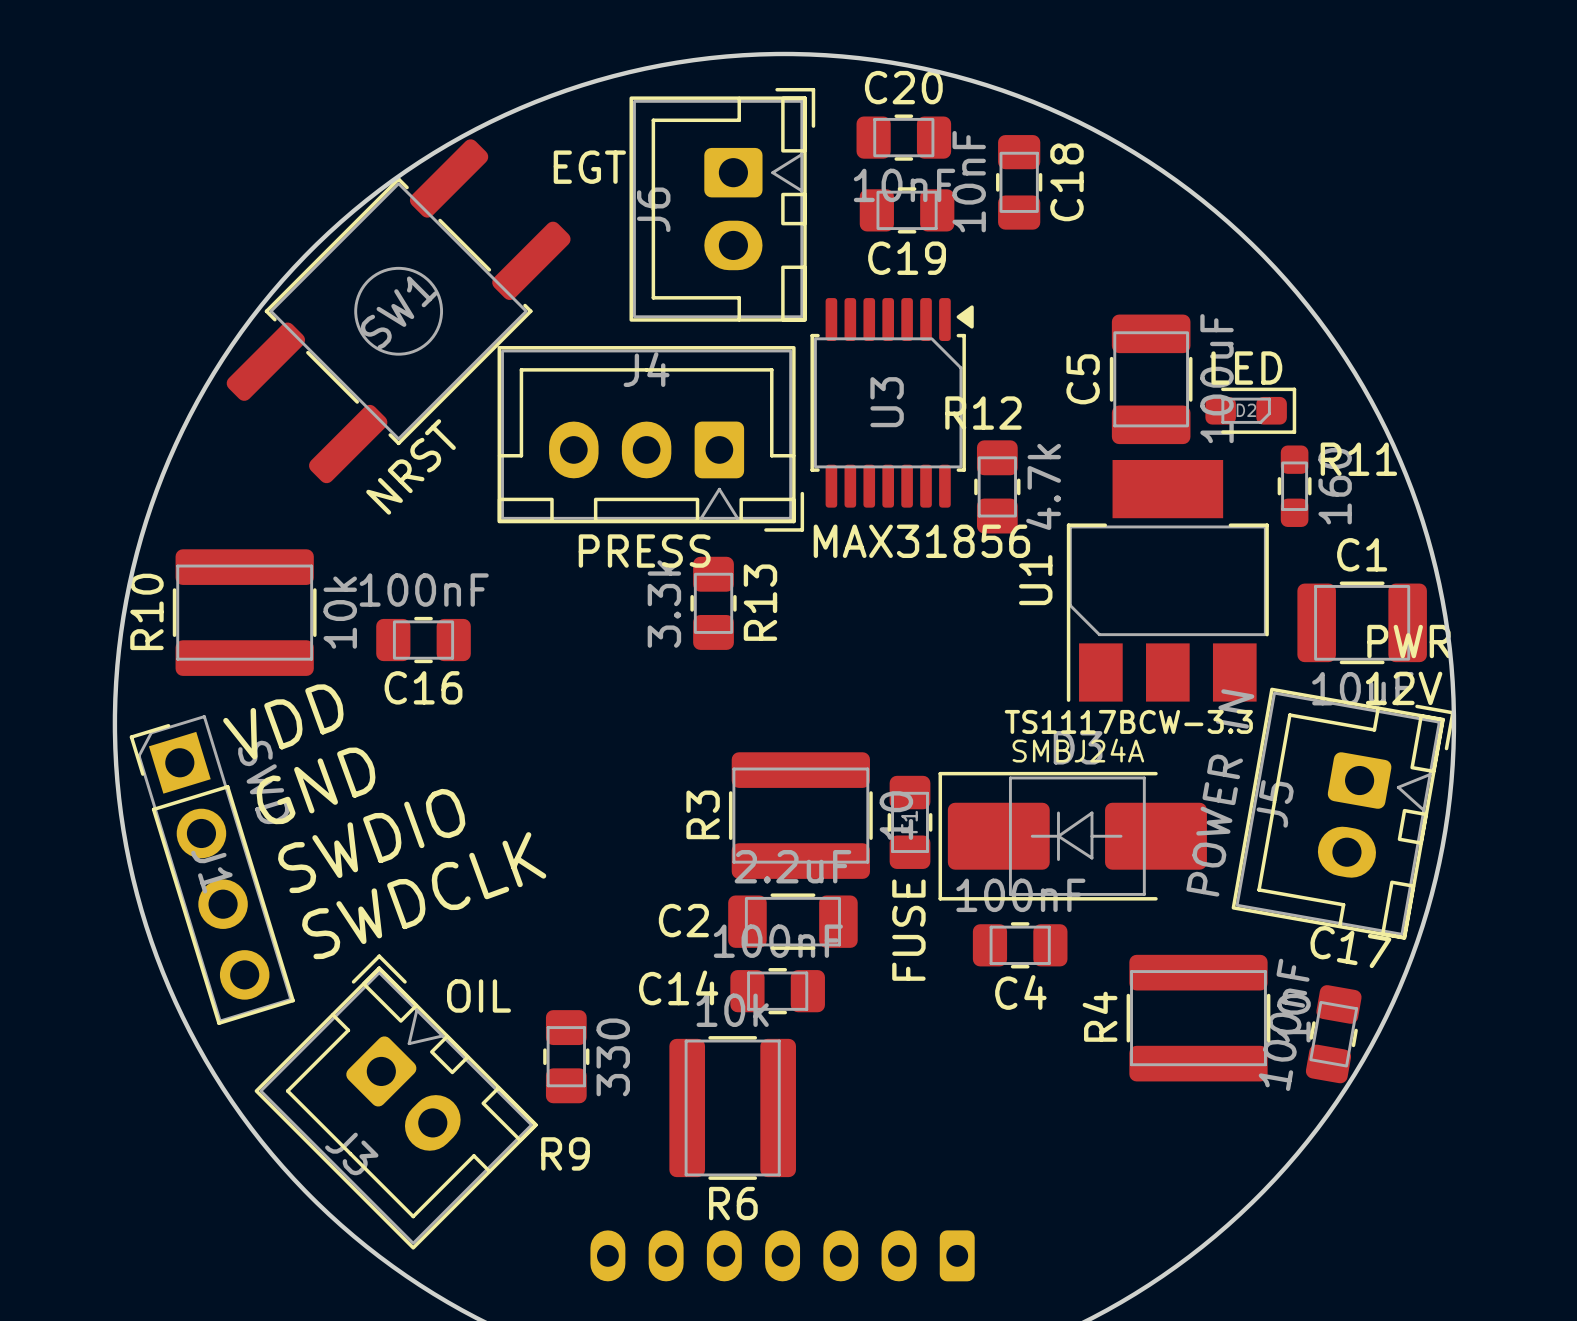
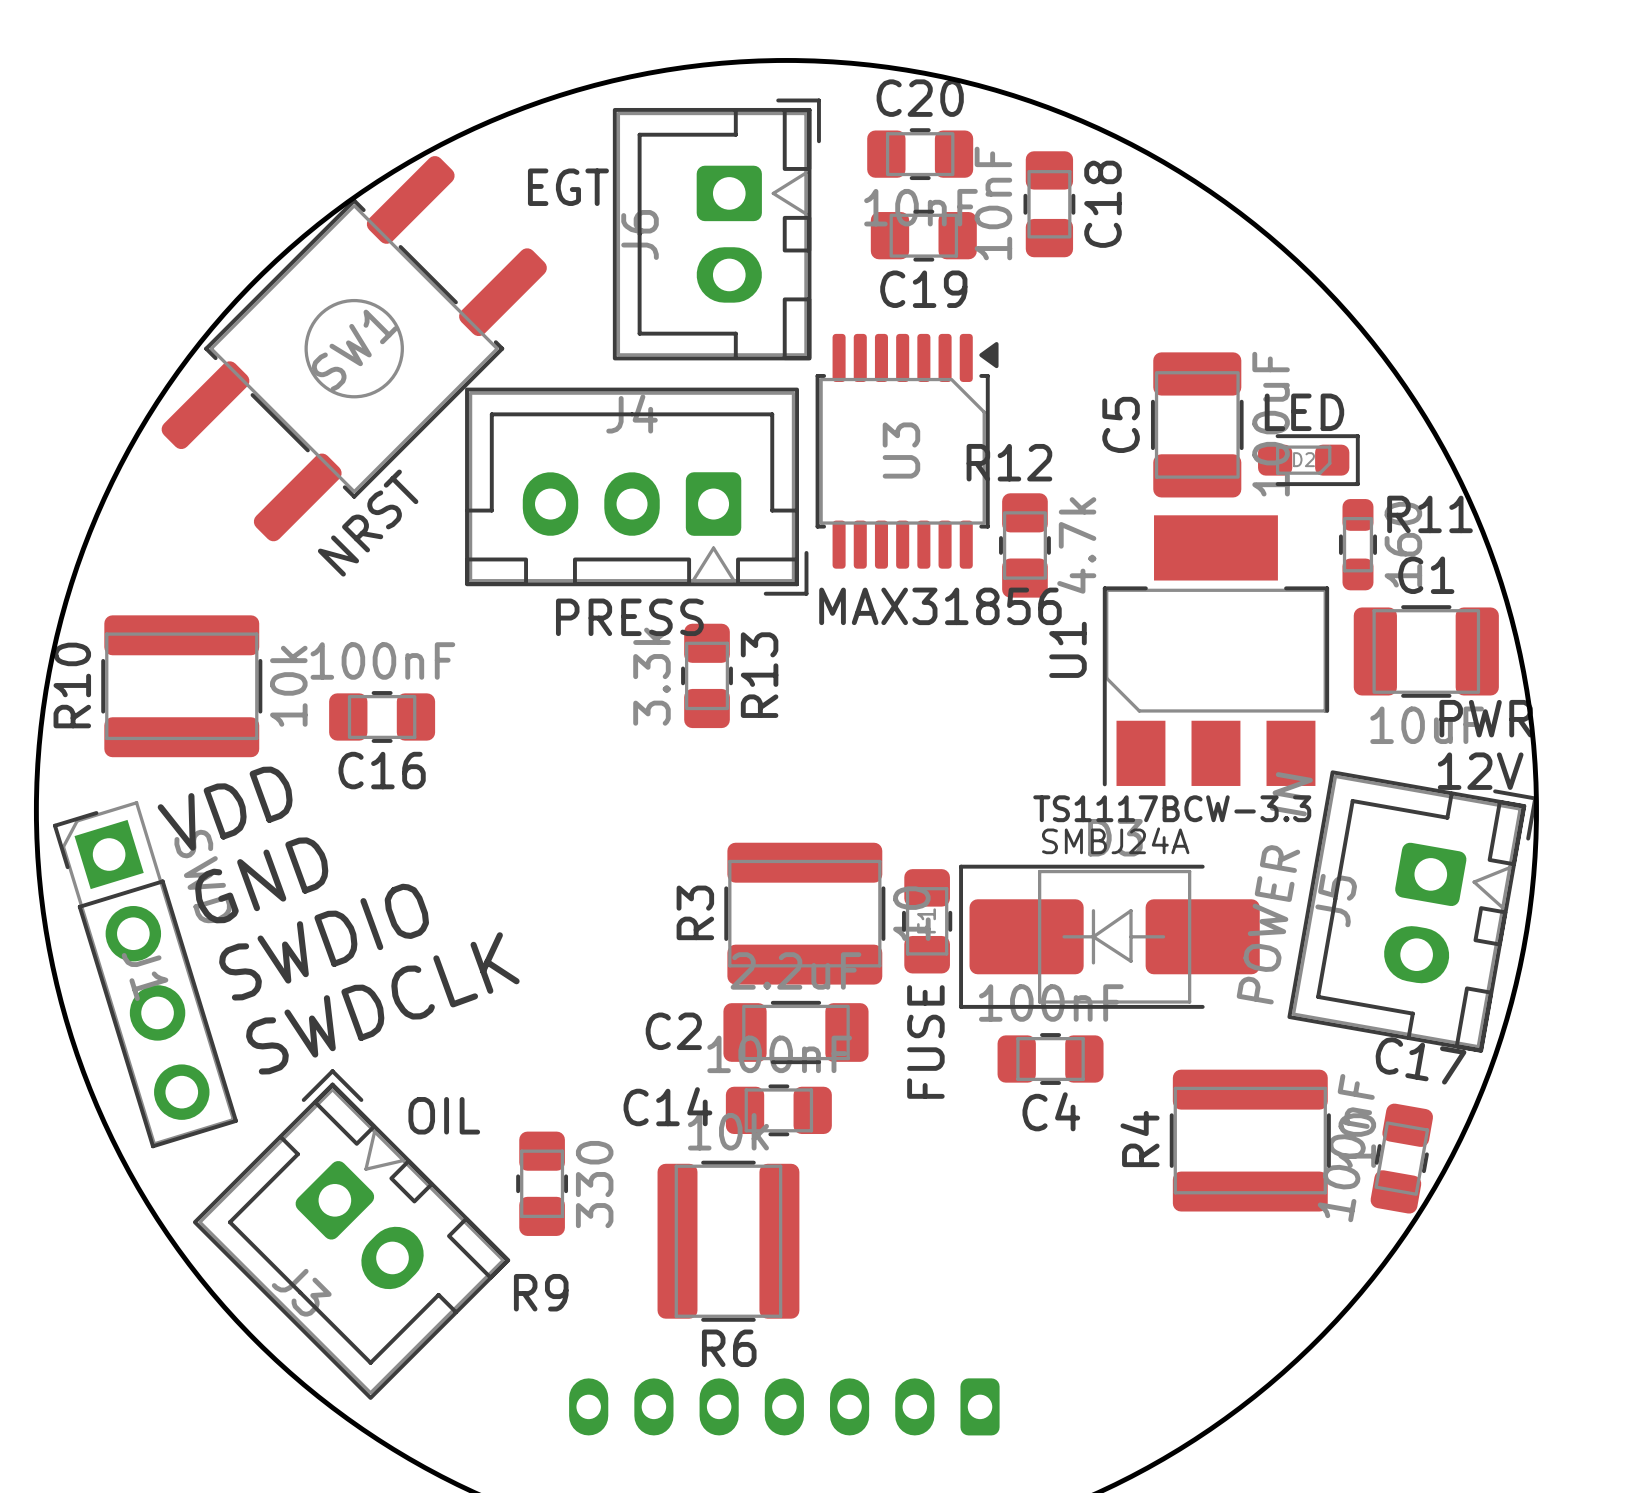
C1 position: (1362, 622) -> (1426, 651)

